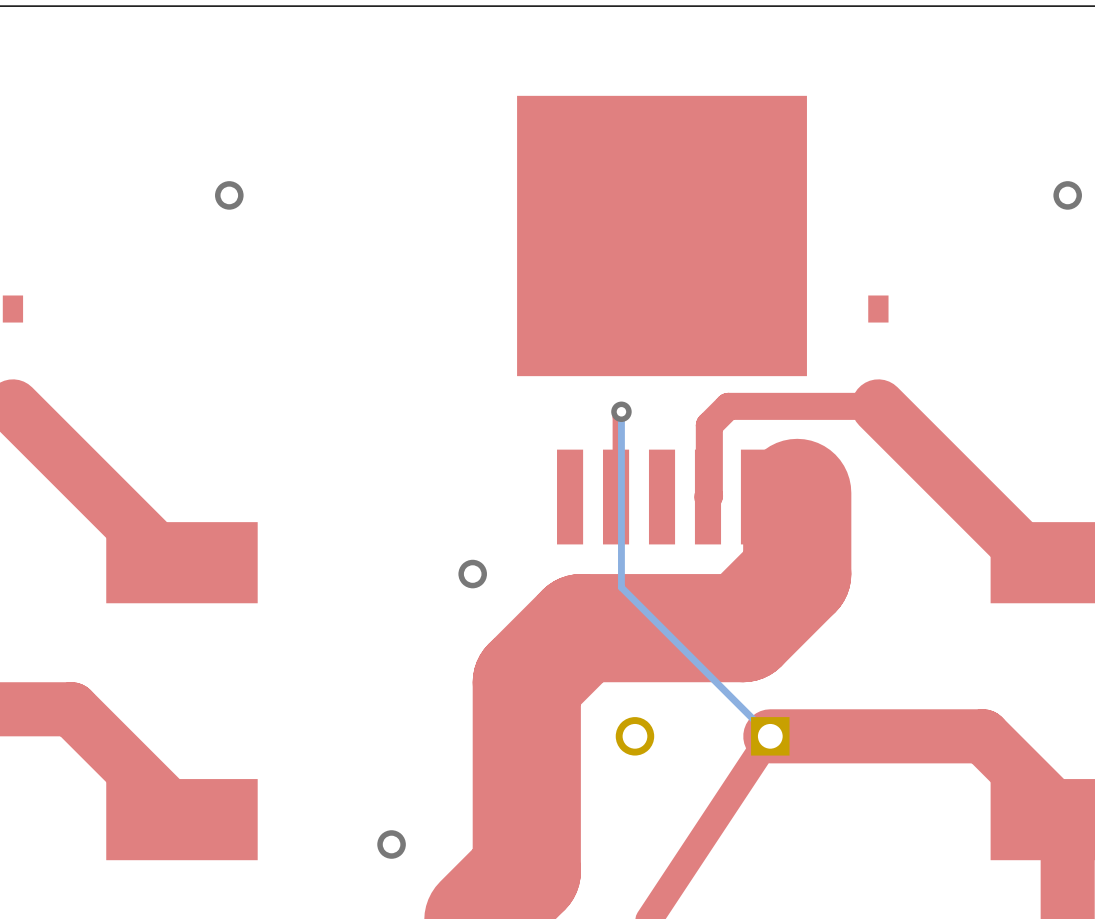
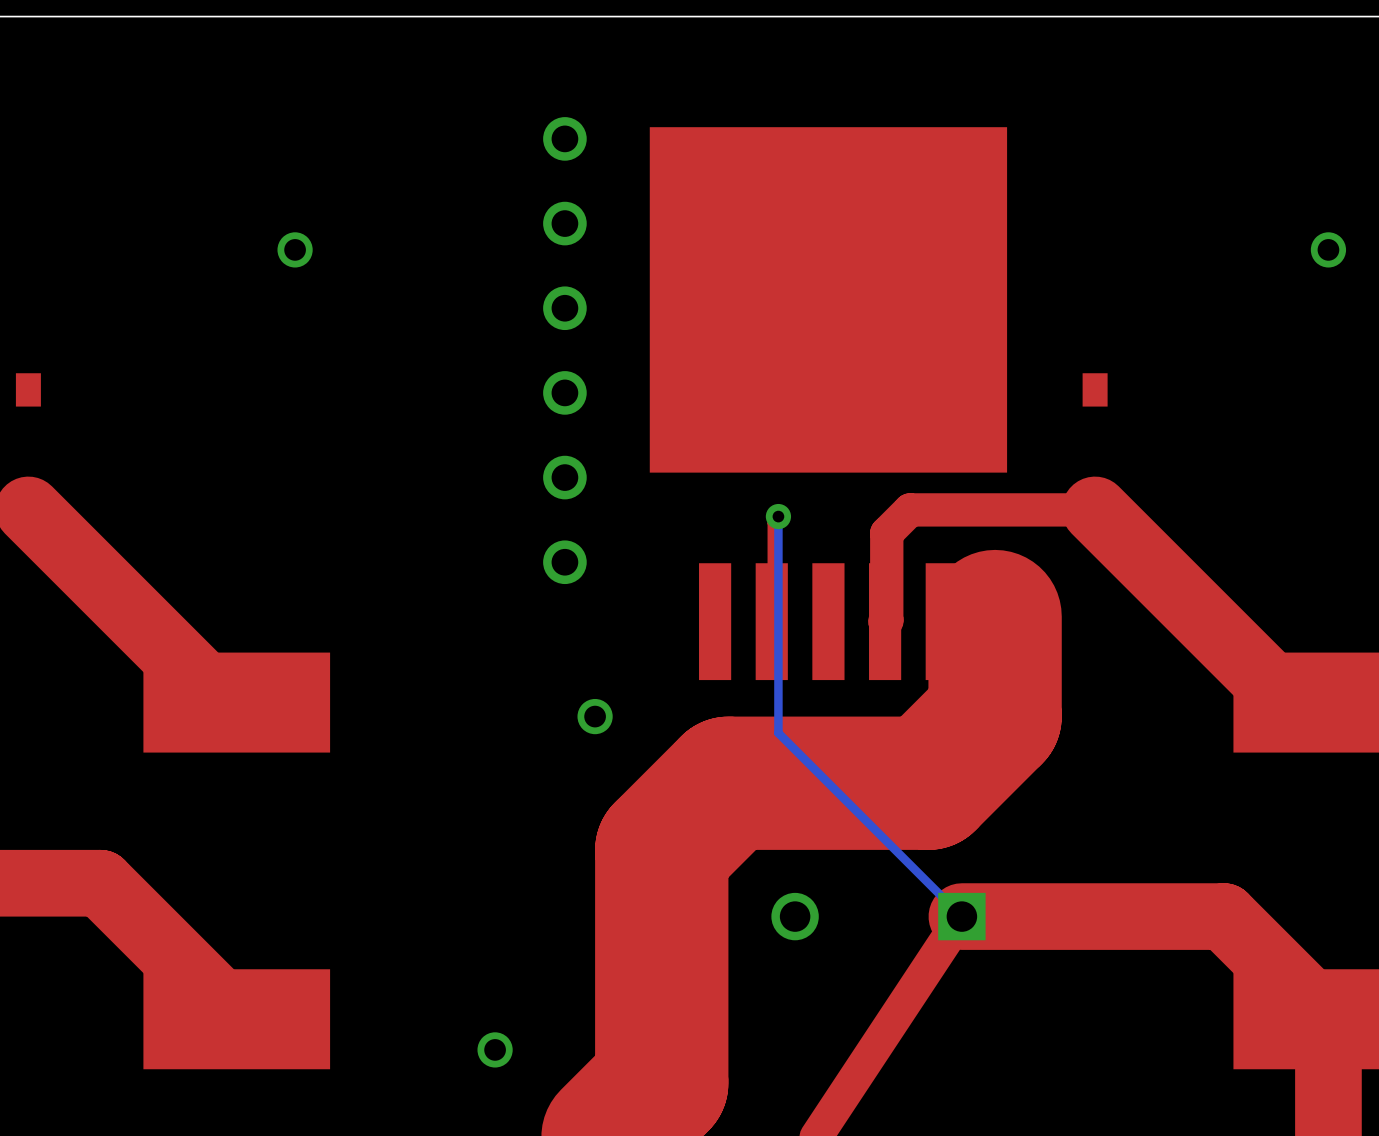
part: none -> (564, 350)

